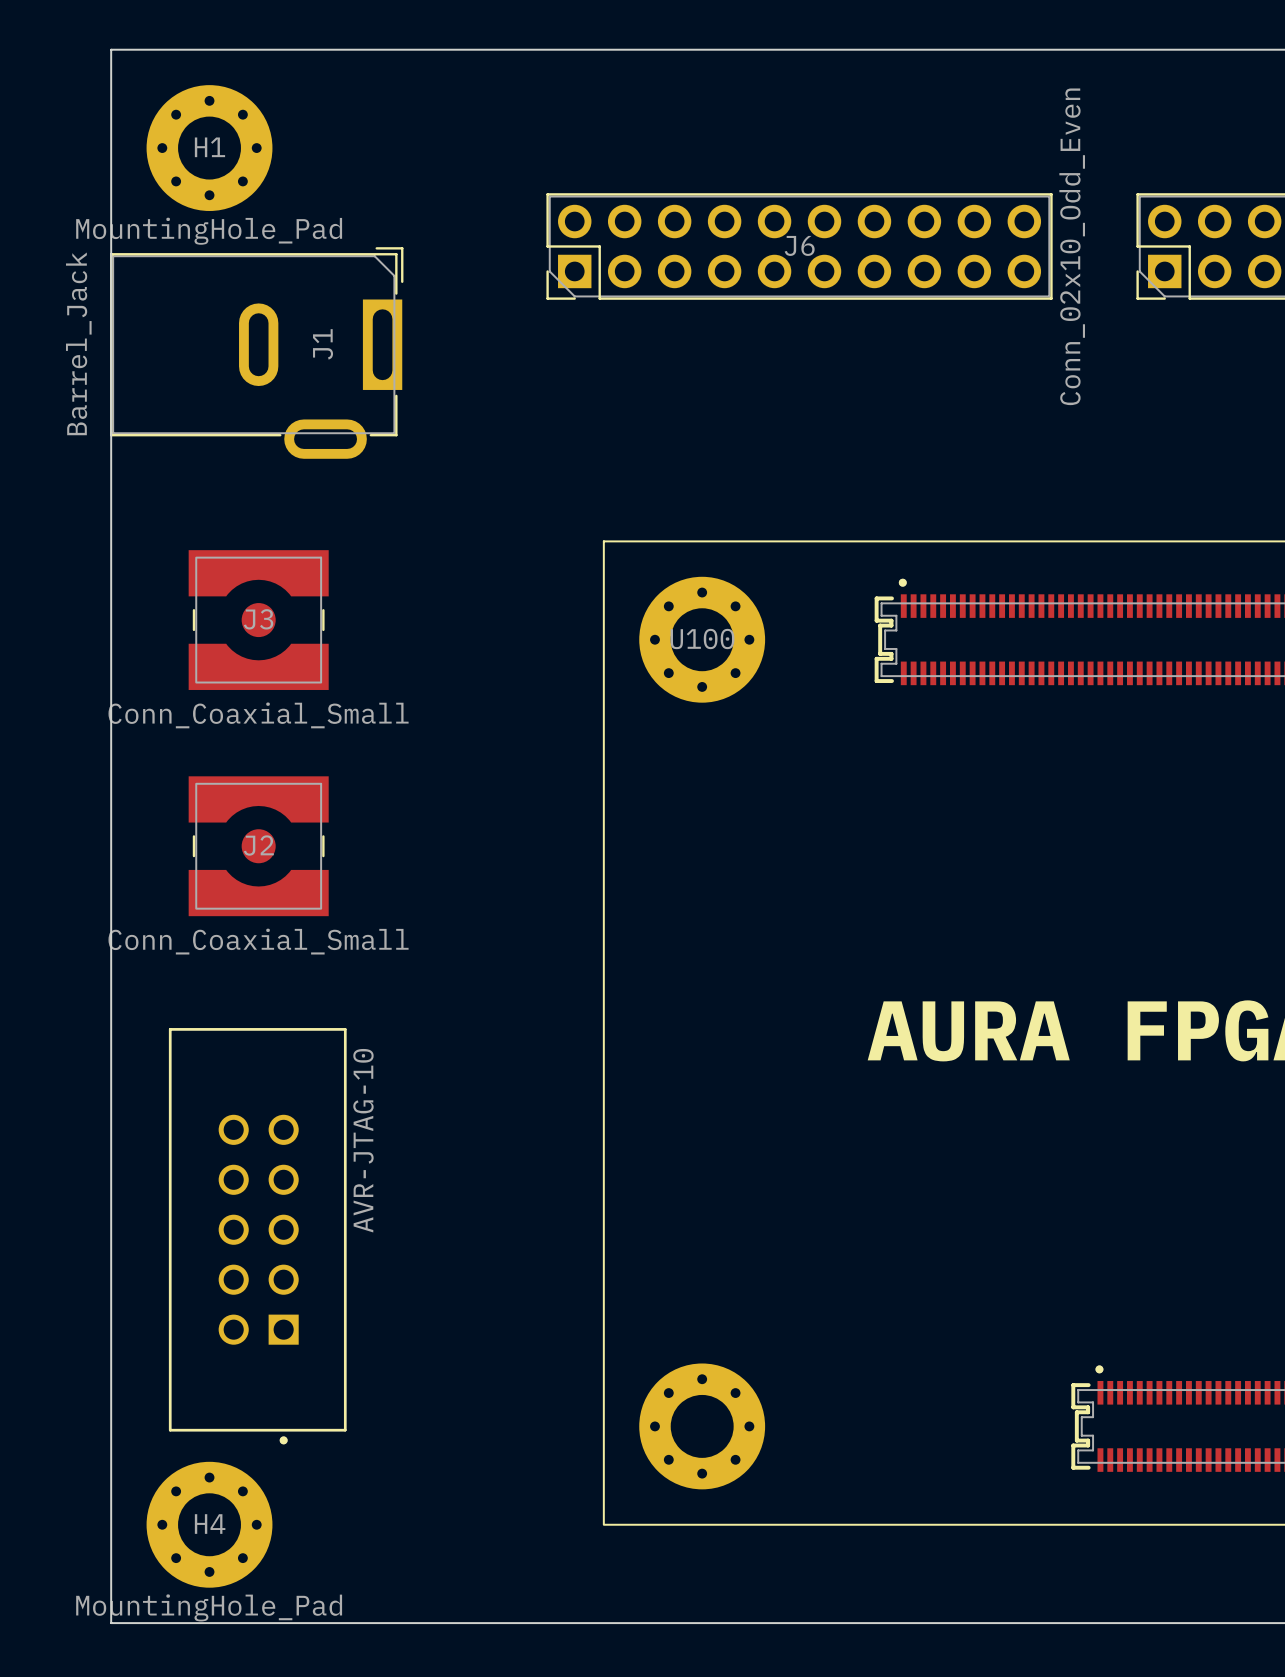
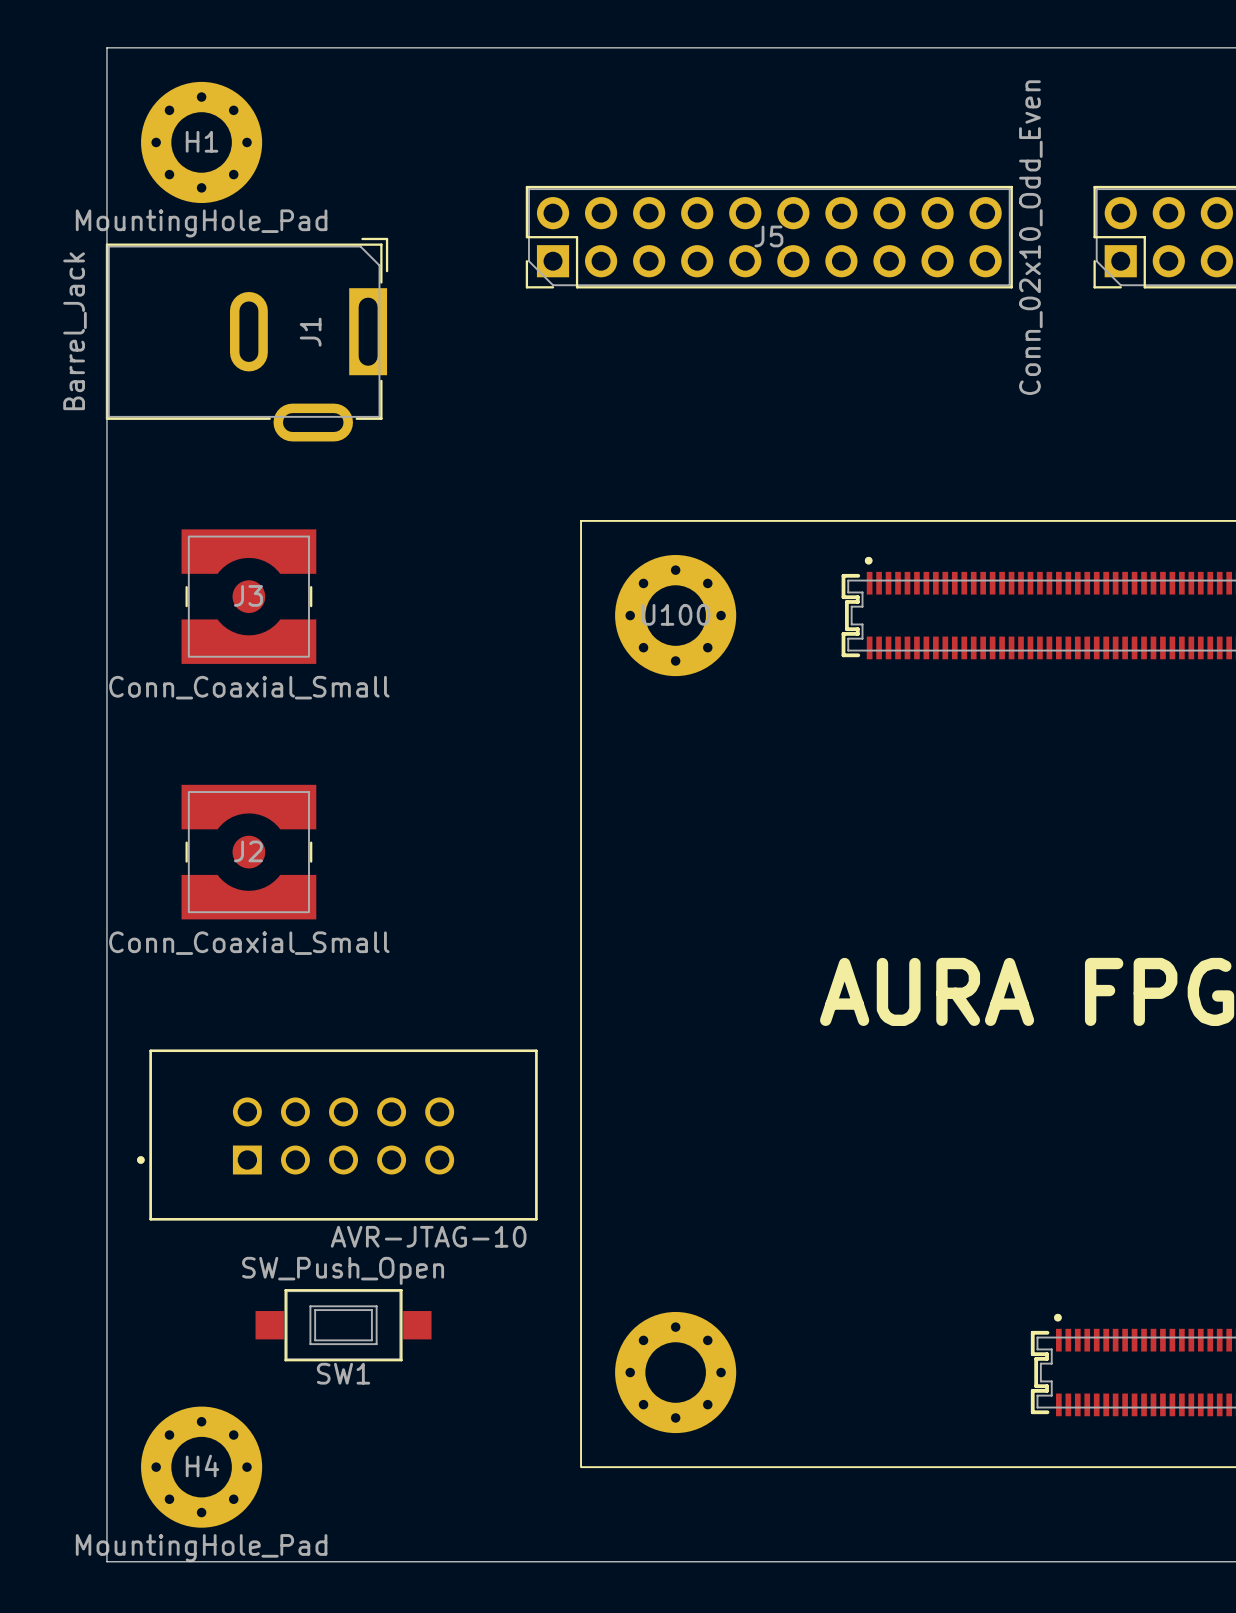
J6 name: J6 (799, 245) -> J5 (768, 236)
J2 position: (258, 846) -> (248, 852)
part rotation: 0° (257, 1236) -> 90° clockwise (337, 1135)
SW1: none -> SW_Push_Open (343, 1325)

